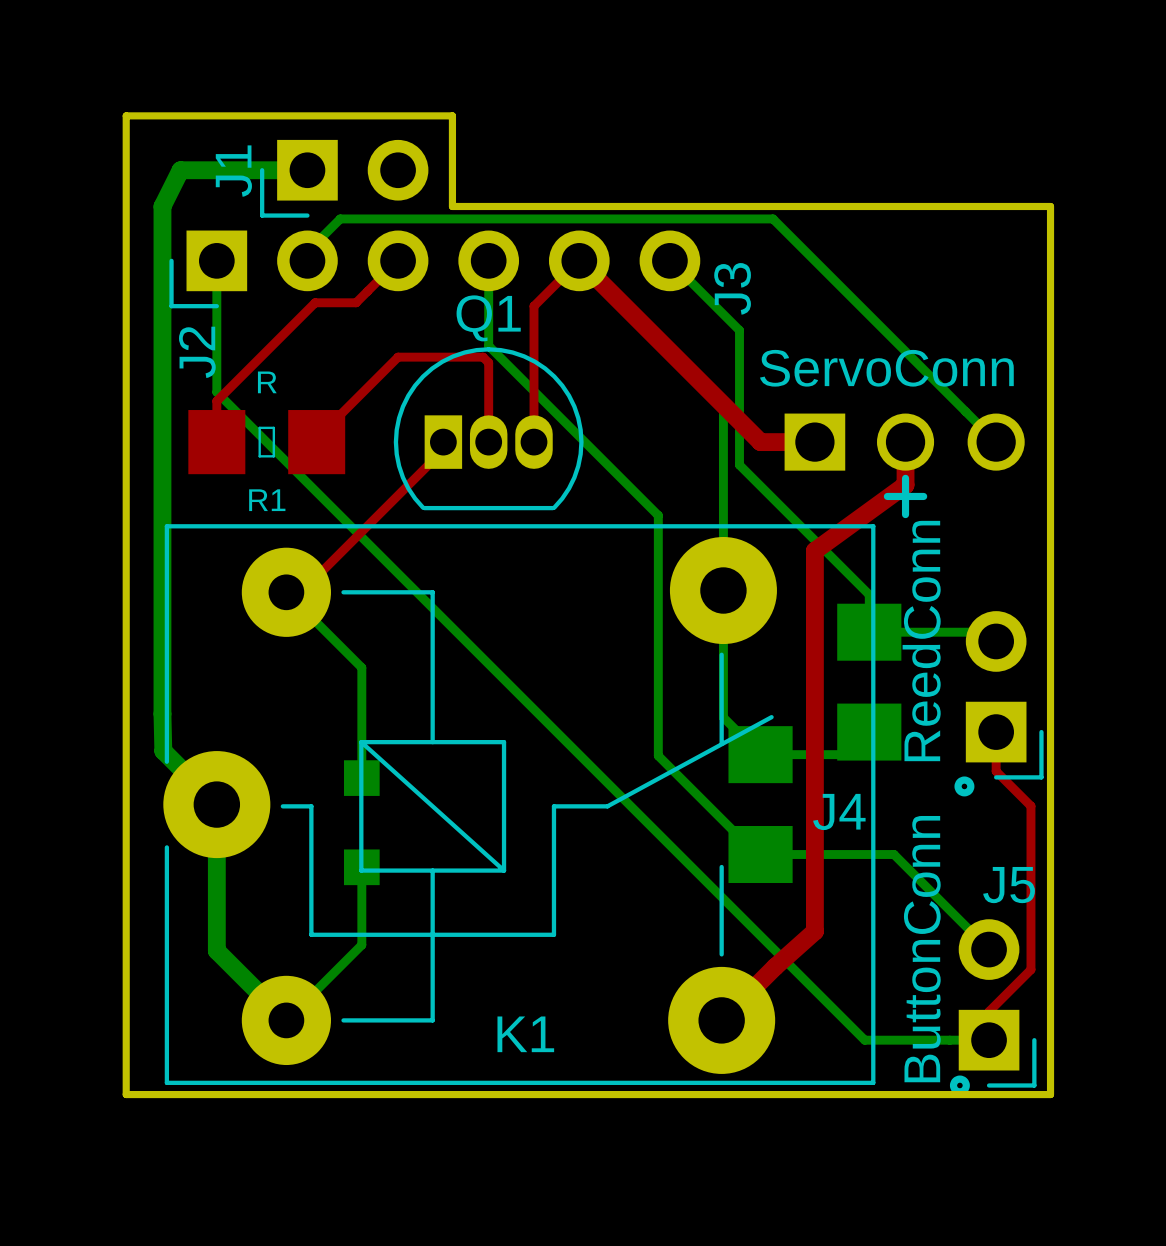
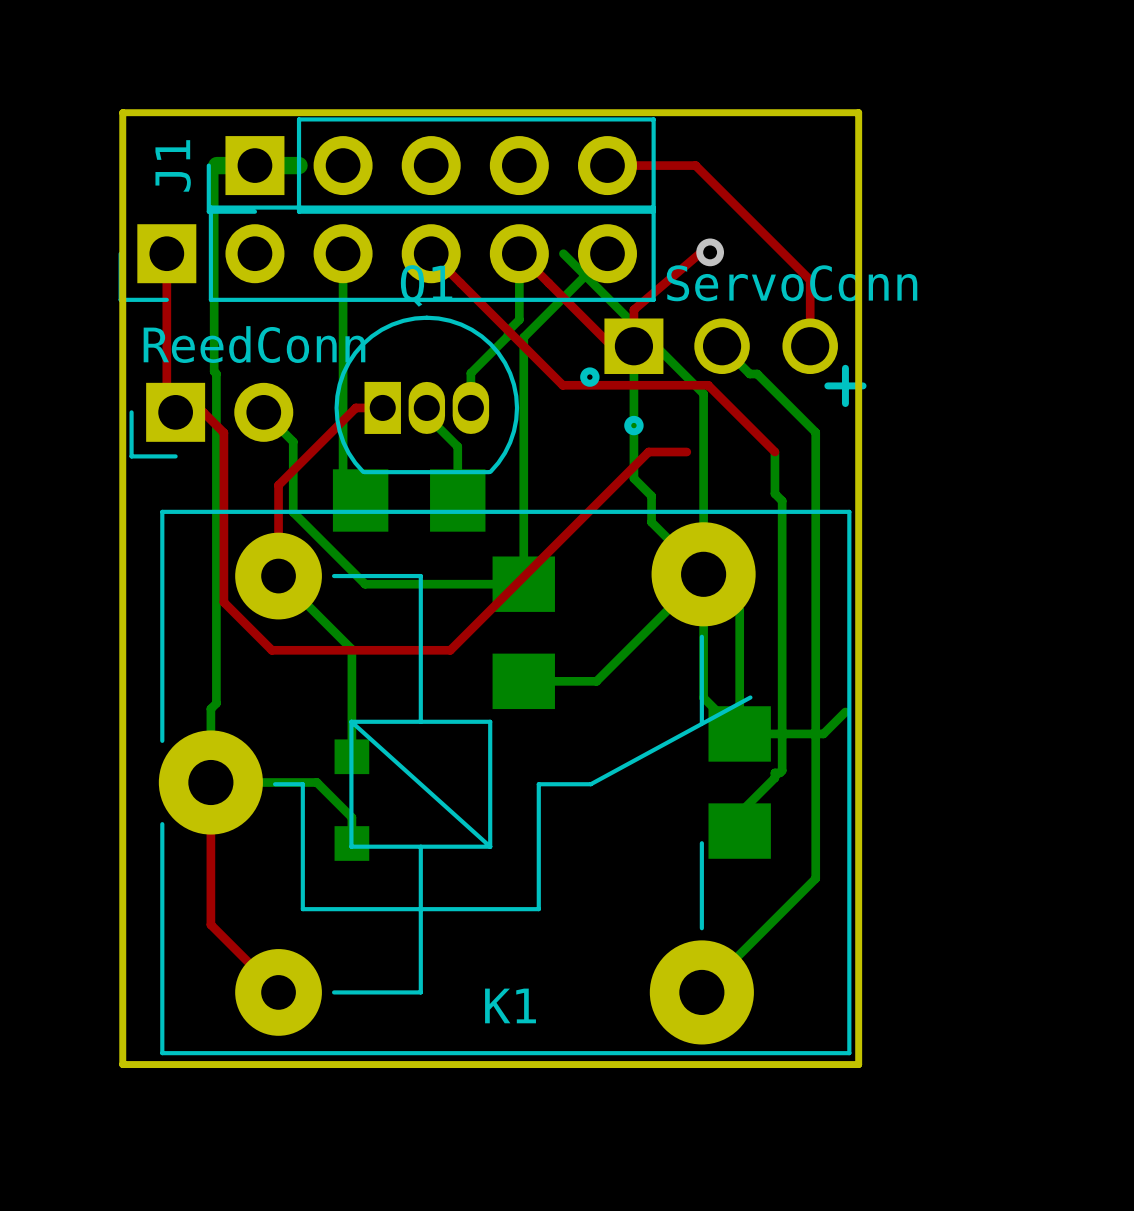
board edge: (452, 115) (452, 206) (1050, 206) (1050, 1094) (882, 1094) -> (440, 112) (858, 112) (858, 1064)
J1 footprint: [260, 139, 429, 218] -> [206, 117, 656, 214]
bottom track: (222, 170) (180, 170) (162, 206) (163, 751) (216, 804) (216, 950) (286, 1020) (361, 944) (361, 867) -> (216, 165) (214, 168) (216, 703) (210, 708) (210, 782) (316, 782) (351, 817) (351, 843)
top track: none -> (607, 165) (695, 165) (810, 280) (810, 346)
J1 name position: J1 (233, 171) -> J1 (173, 165)
top track: none -> (701, 252) (633, 309) (633, 346) (611, 346) (519, 253)
via: none -> (710, 252)
top track: none -> (166, 253) (166, 403) (175, 412) (203, 412) (223, 432) (223, 602) (271, 650) (450, 650) (648, 452) (686, 452)
bottom track: (216, 260) (216, 392) (864, 1040) (989, 1040) -> none
bottom track: (307, 260) (307, 251) (340, 218) (773, 218) (996, 442) -> none
bottom track: none -> (343, 253) (343, 482) (360, 500)
top track: (398, 260) (356, 302) (315, 302) (216, 401) (216, 442) -> none
part: none -> (387, 253)
top track: none -> (431, 253) (562, 385) (708, 385) (774, 452)
bottom track: (488, 260) (488, 345) (658, 515) (658, 755) (756, 854) (893, 854) (989, 949) -> none
bottom track: none -> (519, 253) (519, 319) (508, 330) (508, 335) (470, 373) (470, 407)
bottom track: none -> (607, 253) (523, 337) (523, 584) (365, 584) (293, 512) (293, 441) (263, 412)
bottom track: (669, 260) (739, 330) (739, 465) (869, 594) (869, 632) (986, 632) (996, 641) -> none
J2: (434, 269) -> none
bottom track: none -> (633, 346) (633, 478) (651, 496) (651, 522) (739, 610) (739, 733)
part: none -> ServoConn (721, 346)
bottom track: none -> (722, 346) (749, 374) (757, 374) (815, 432) (815, 878) (701, 992)
drawing: none -> [580, 367, 644, 436]
bottom track: none -> (426, 407) (426, 415) (457, 446) (457, 500)
Q1 position: (488, 428) -> (426, 394)
part: none -> ReedConn (211, 420)
R1 side: top (266, 442) -> bottom (409, 500)
top track: (316, 442) (316, 438) (398, 357) (483, 357) (488, 362) (488, 442) -> none
top track: (443, 442) (443, 450) (301, 592) (286, 592) -> (382, 407) (355, 407) (278, 485) (278, 576)
top track: (534, 442) (534, 306) (579, 260) (760, 442) (814, 442) -> none
J3: ServoConn (904, 442) -> none
top track: (905, 442) (905, 484) (814, 550) (814, 931) (775, 966) (721, 1020) -> none
bottom track: none -> (774, 452) (774, 493) (782, 500) (782, 770) (774, 772) (774, 777) (739, 813) (739, 831)
line: (905, 478) (905, 514) -> (845, 368) (845, 403)
line: (887, 496) (923, 496) -> (827, 385) (863, 385)
bottom track: none -> (703, 574) (596, 681) (523, 681)
part position: (869, 682) -> (523, 632)
J4: ReedConn (1004, 695) -> none
top track: (996, 732) (996, 771) (1030, 806) (1030, 969) (989, 1011) (989, 1040) -> none
drawing: [954, 776, 975, 797] -> none
top track: none -> (210, 782) (210, 924) (278, 992)
J5: ButtonConn (997, 1003) -> none
drawing: [949, 1075, 970, 1096] -> none

